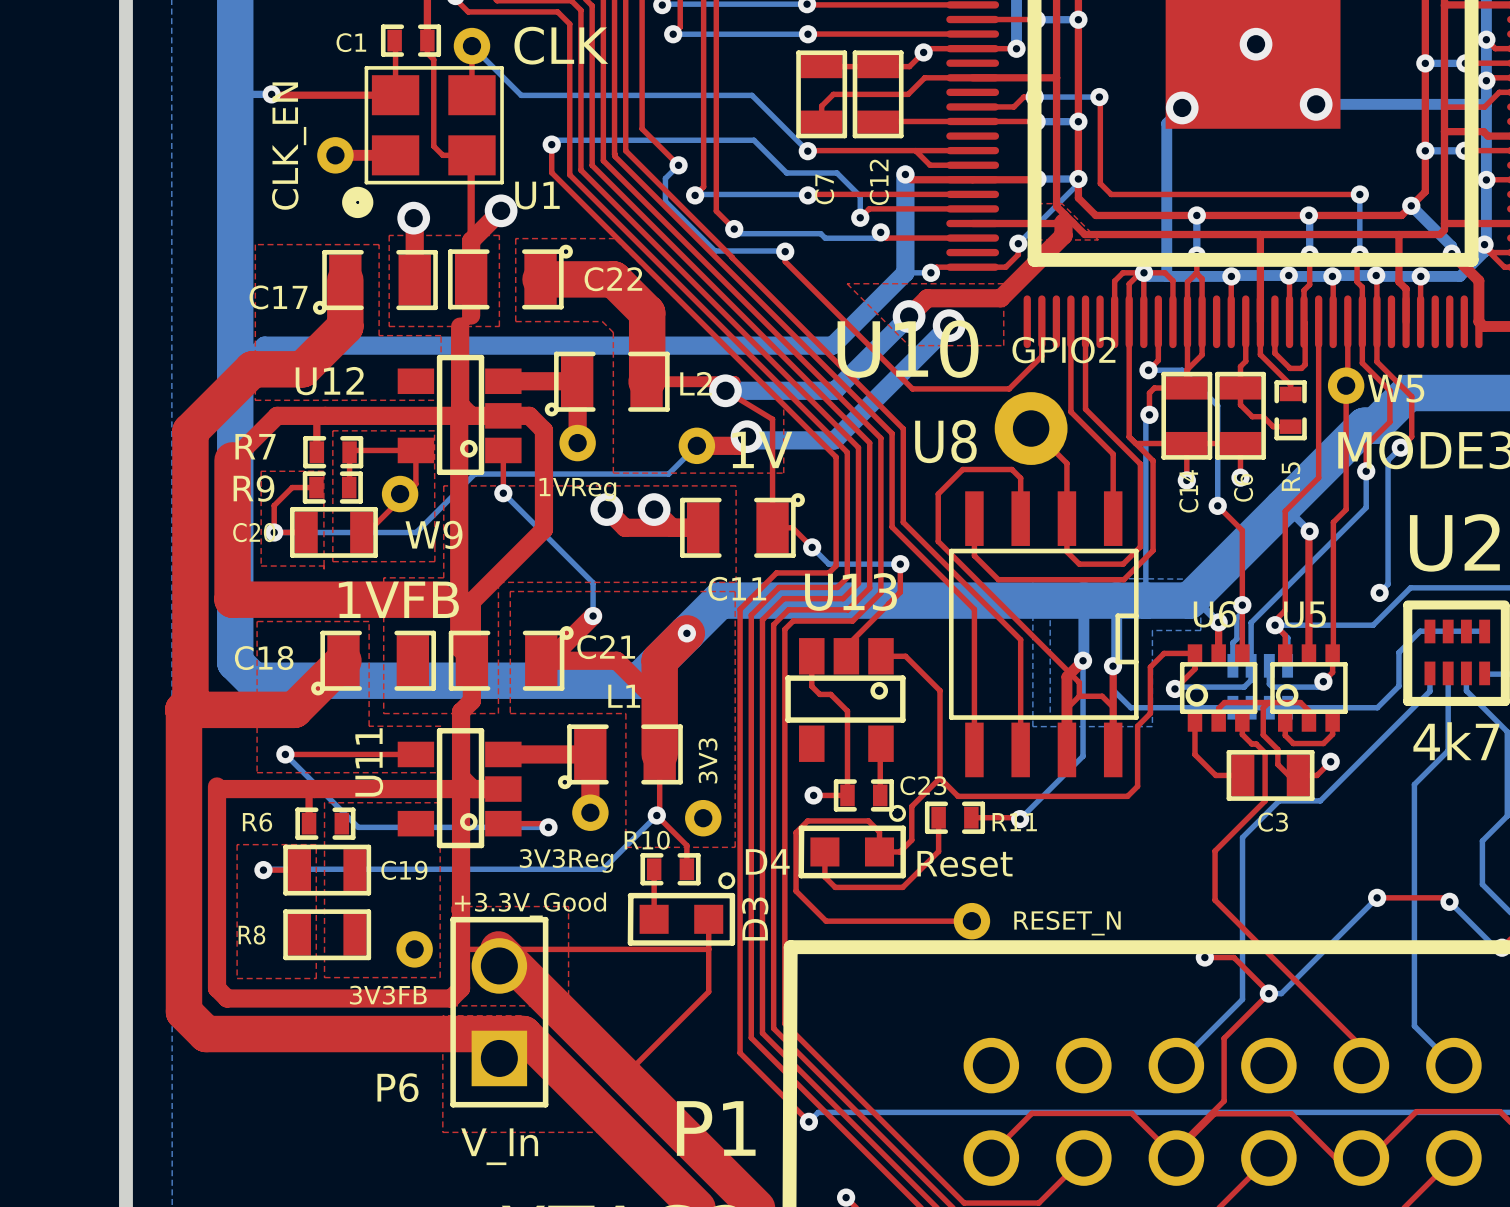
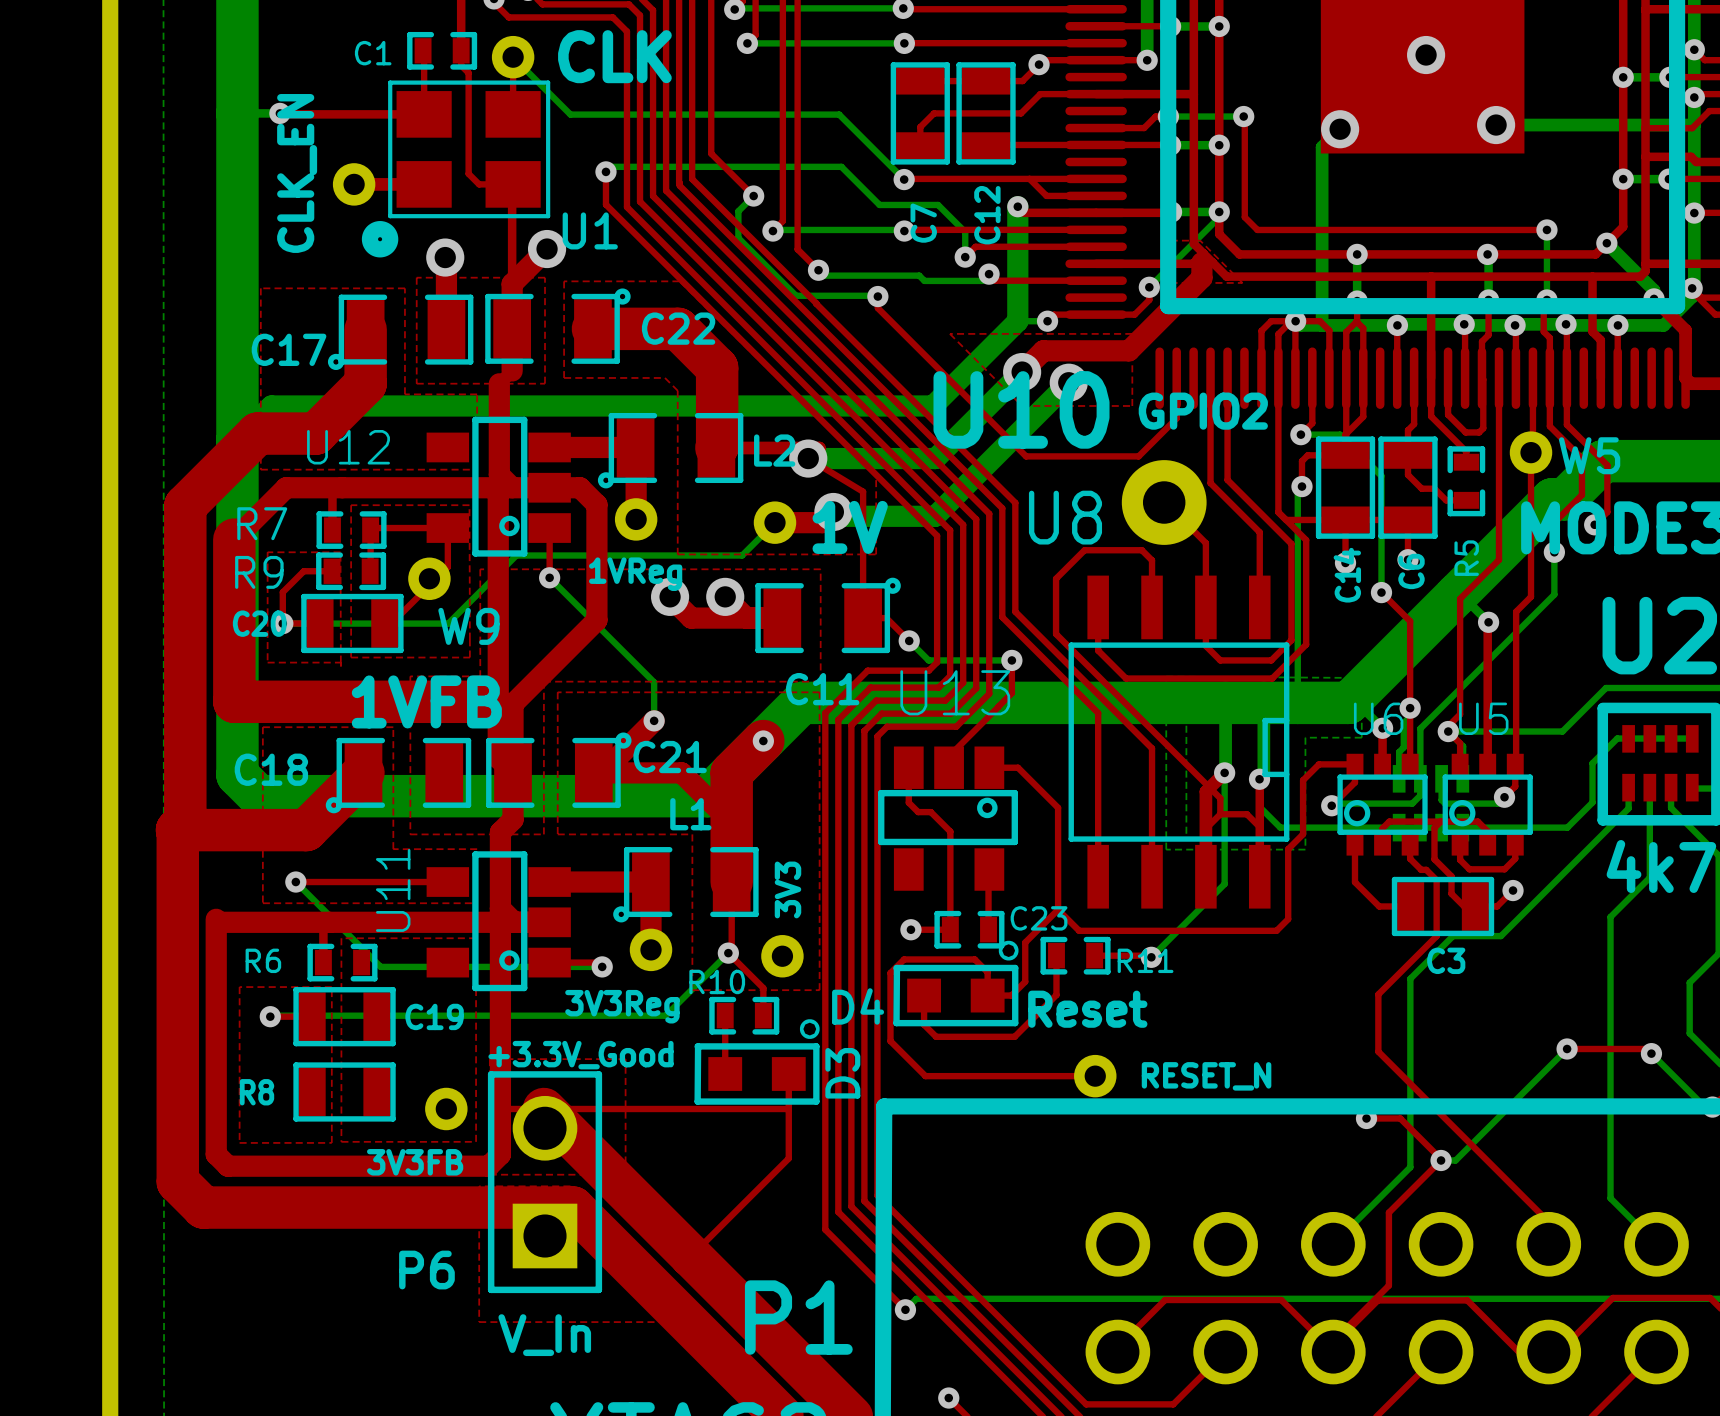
bottom track: (1400, 447) (1388, 460) (1388, 584) (1379, 592) -> none
via: (1379, 592) -> none

